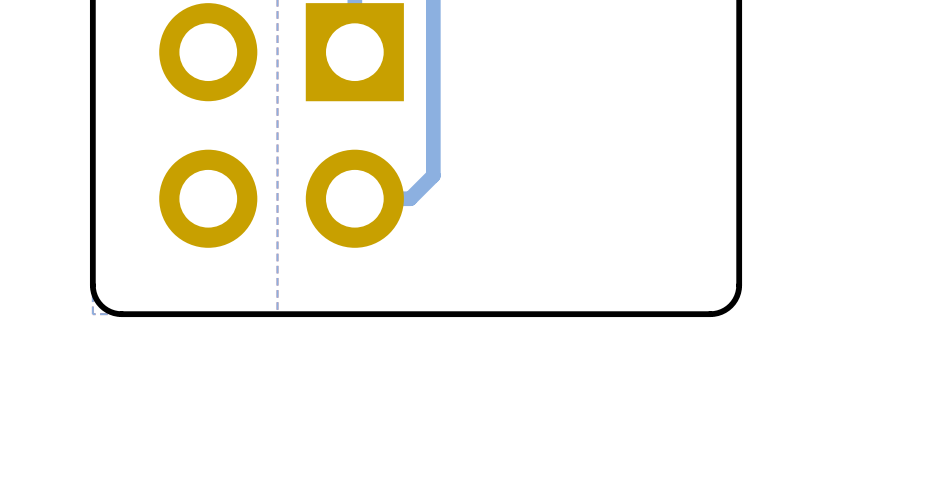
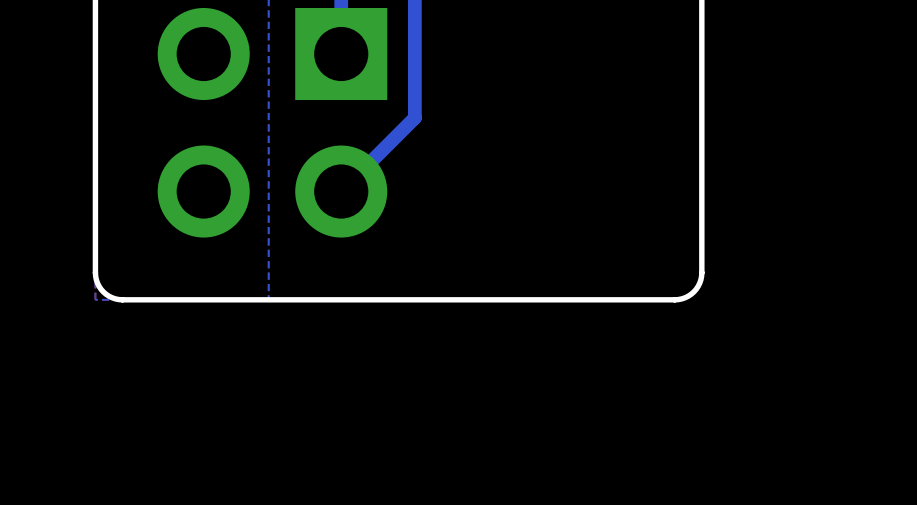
bottom track: (433, 120) (433, 175) (410, 198) (354, 198) -> (414, 117) (341, 191)

